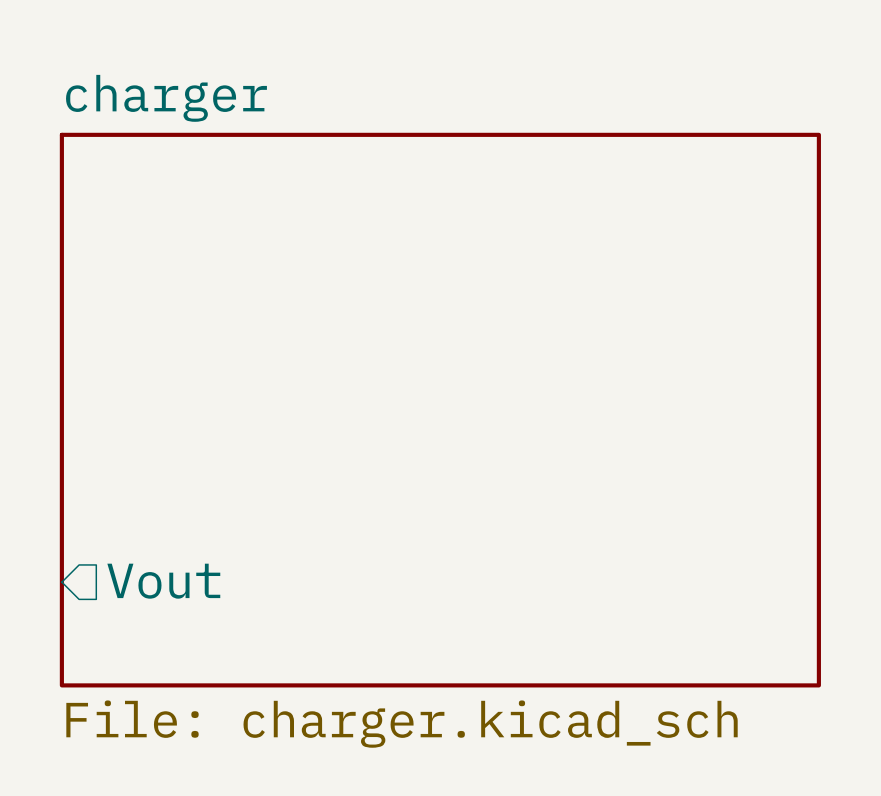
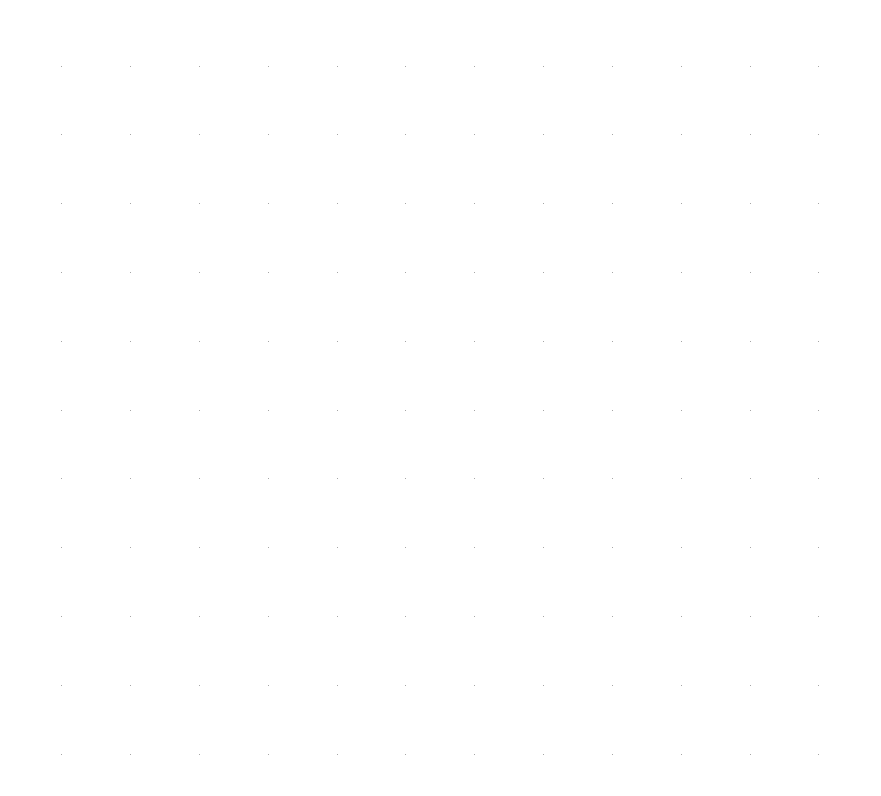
sheet charger: File: charger.kicad_sch (440, 410) -> none
sheet pin: Vout (163, 581) -> none

